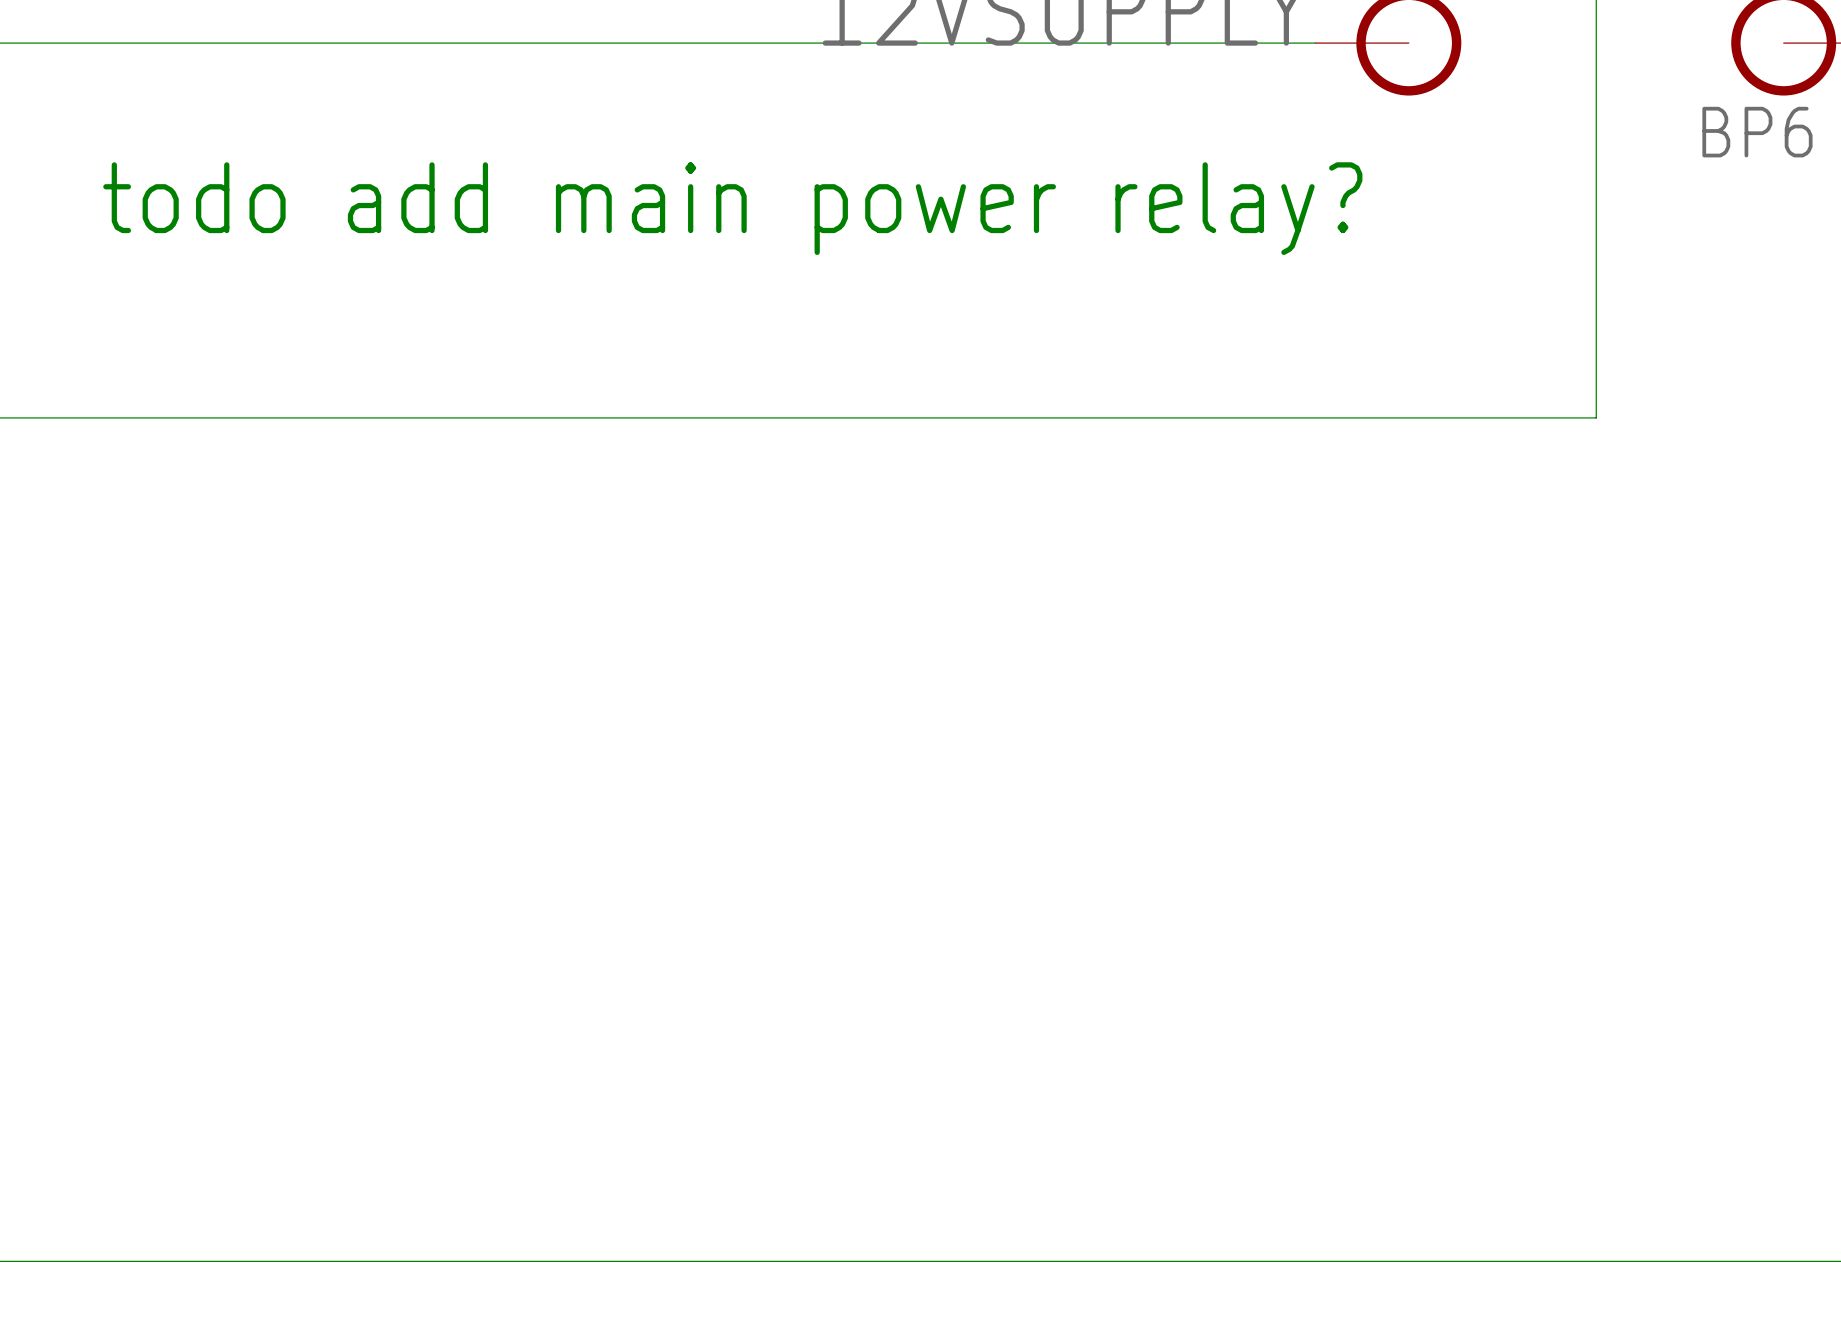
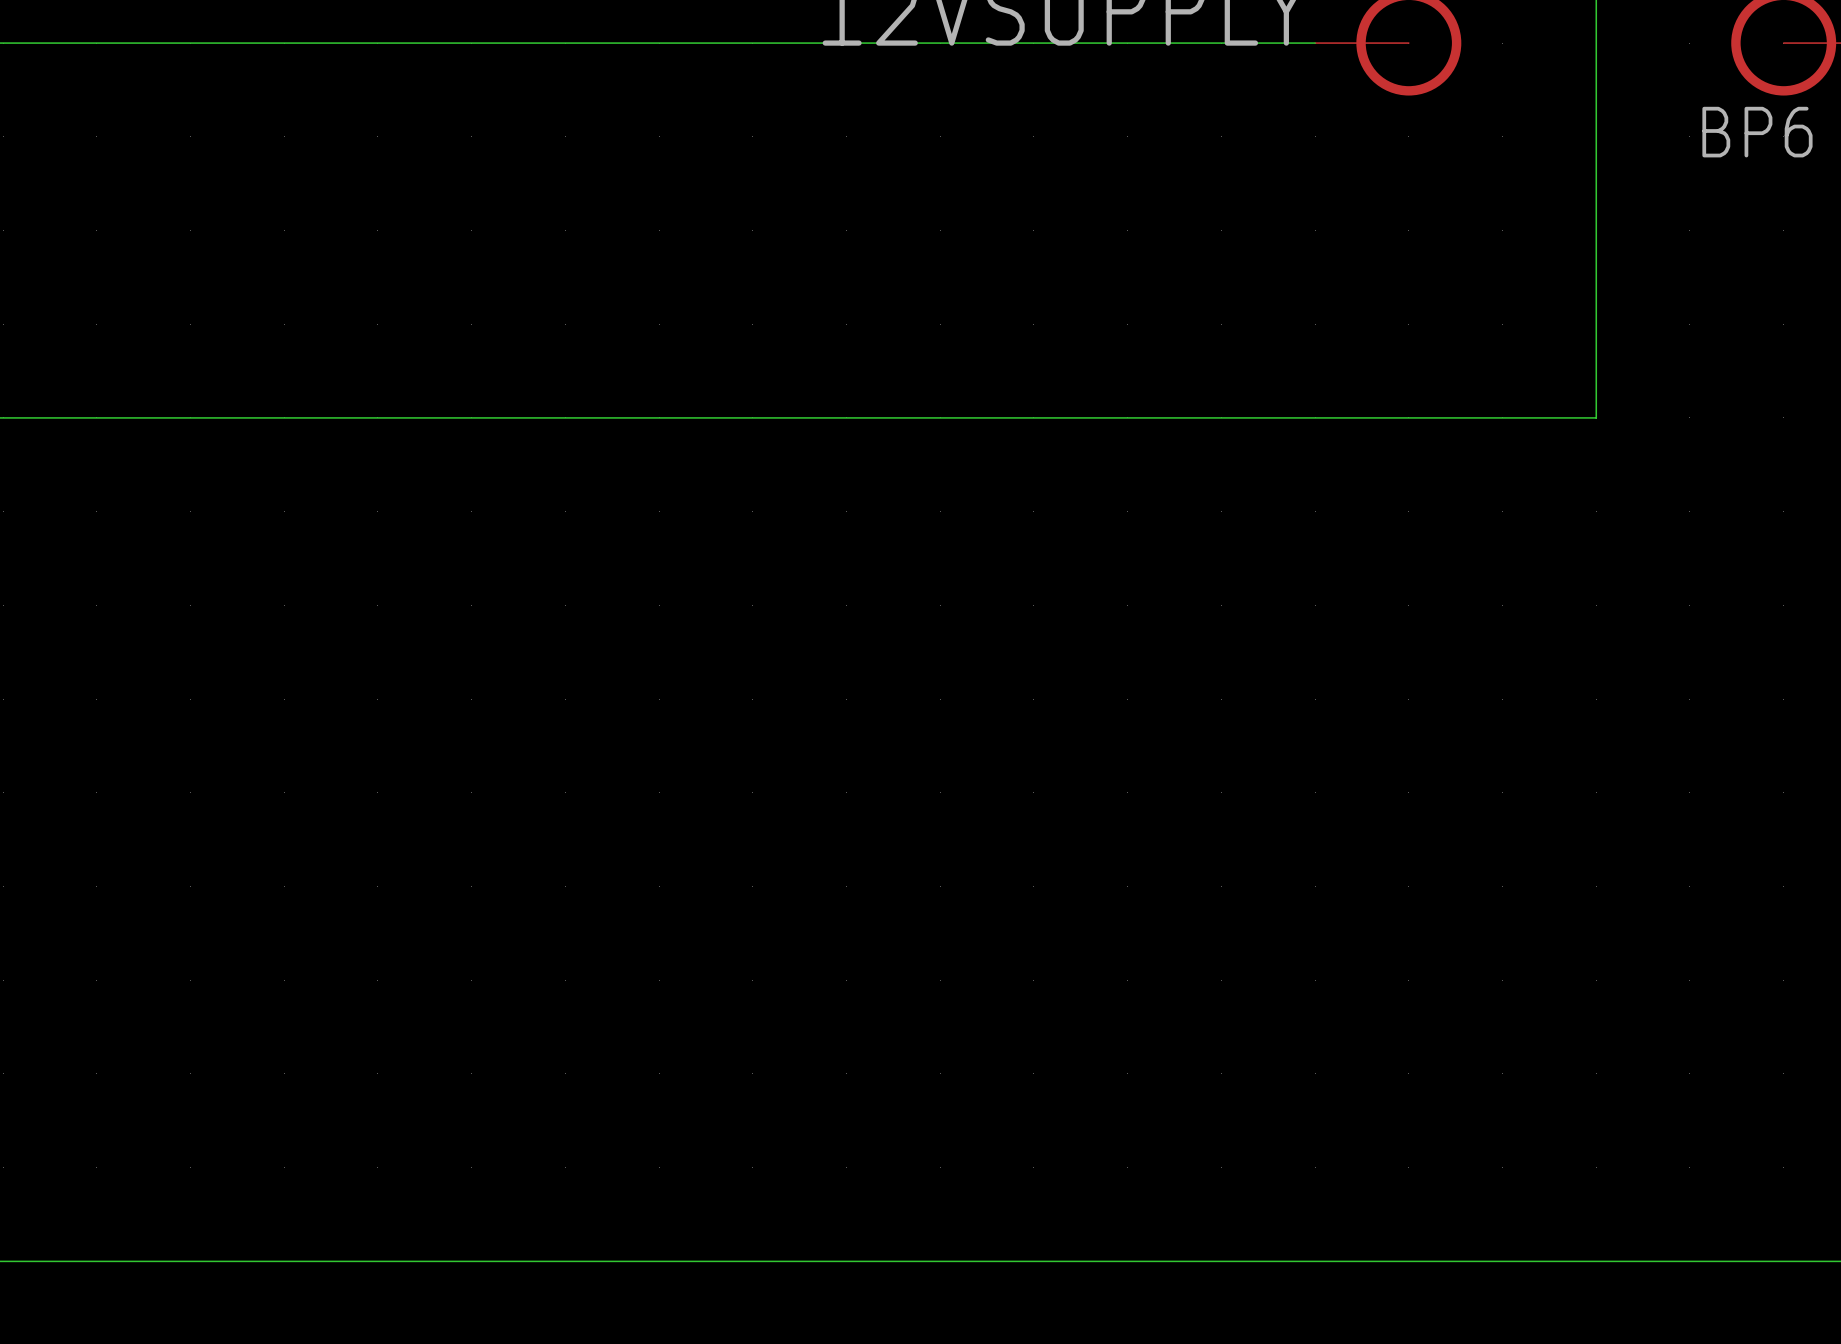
text: todo add main power relay? (732, 208) -> none

